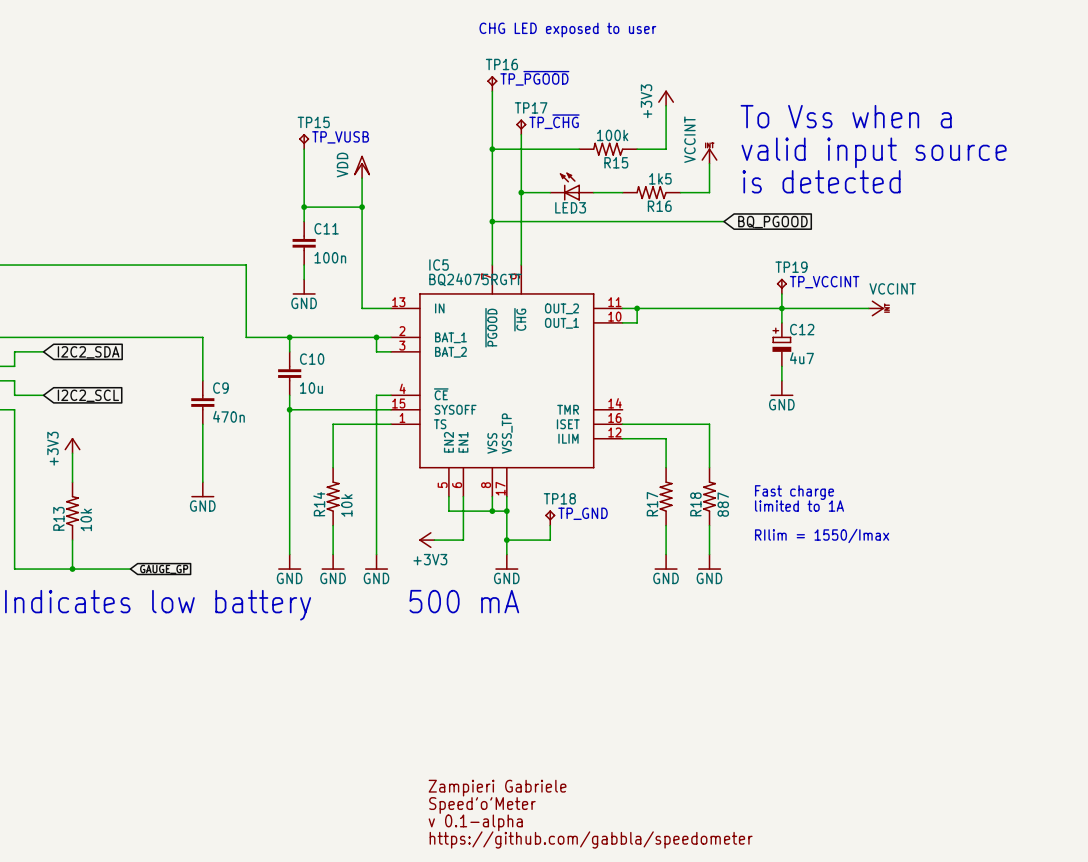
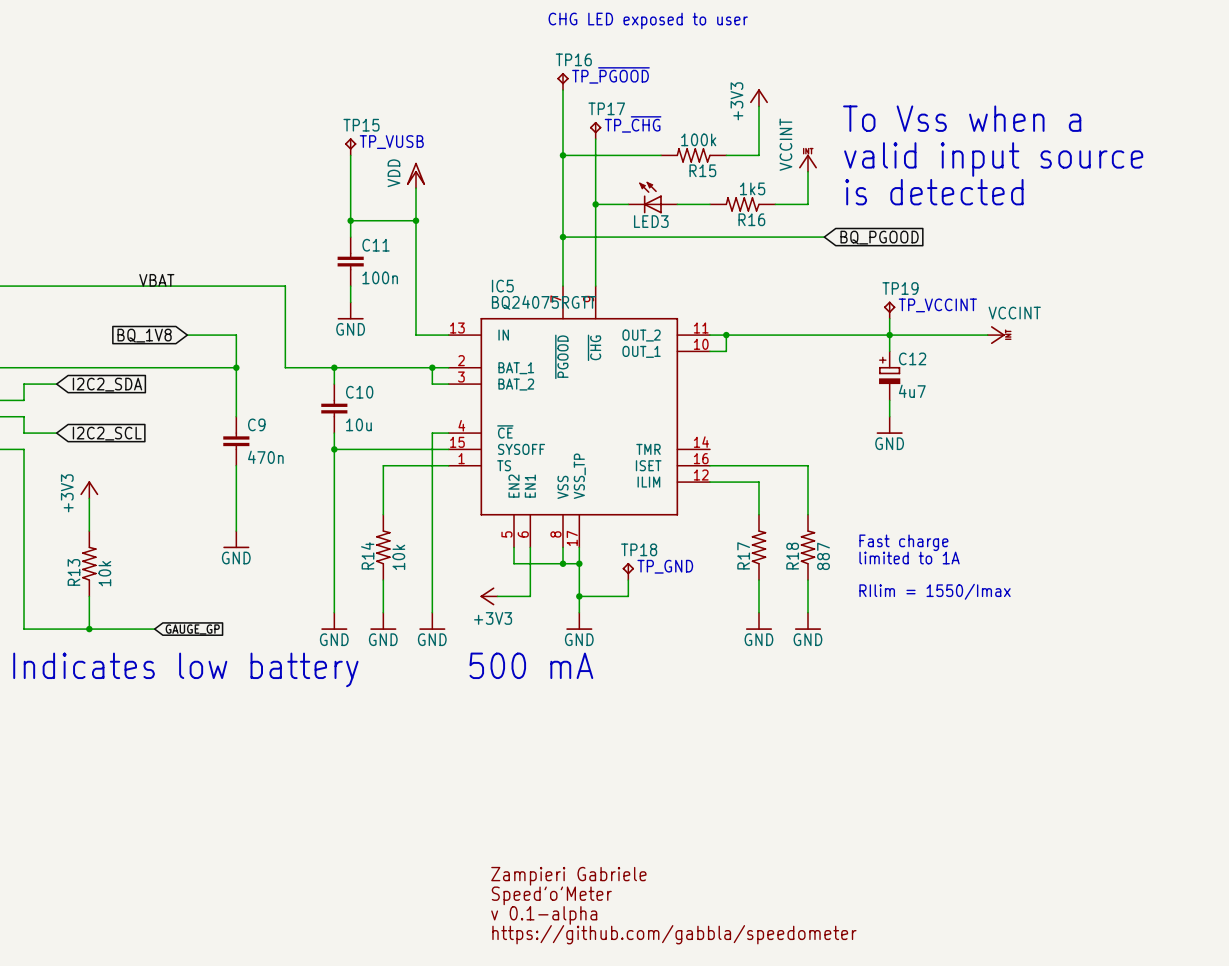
label: none -> VBAT (156, 280)
global label: none -> BQ_1V8 (144, 335)
wire: none -> (187, 335) (236, 335) (236, 367)
junction: none -> (236, 367)

